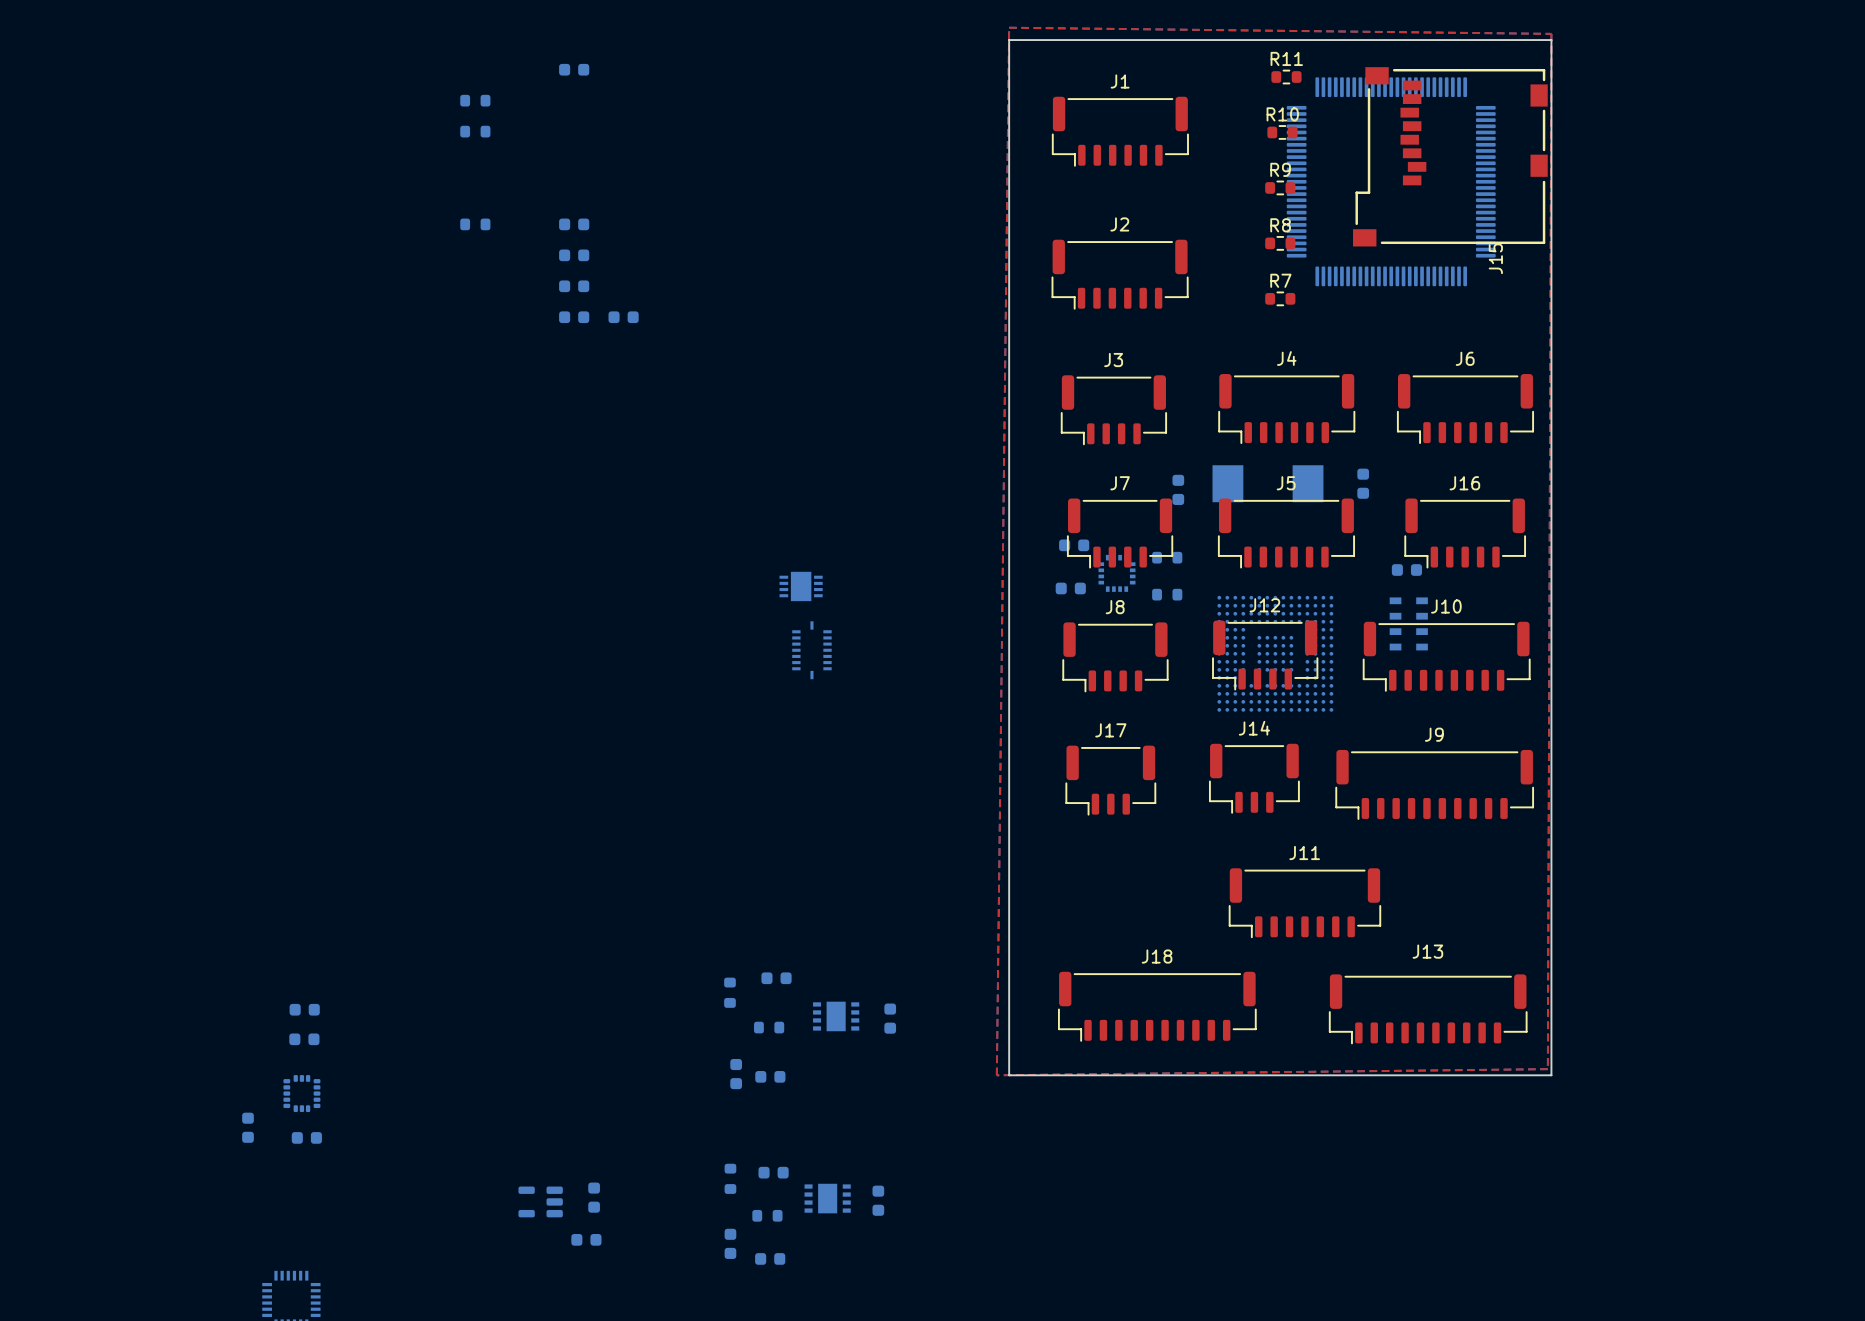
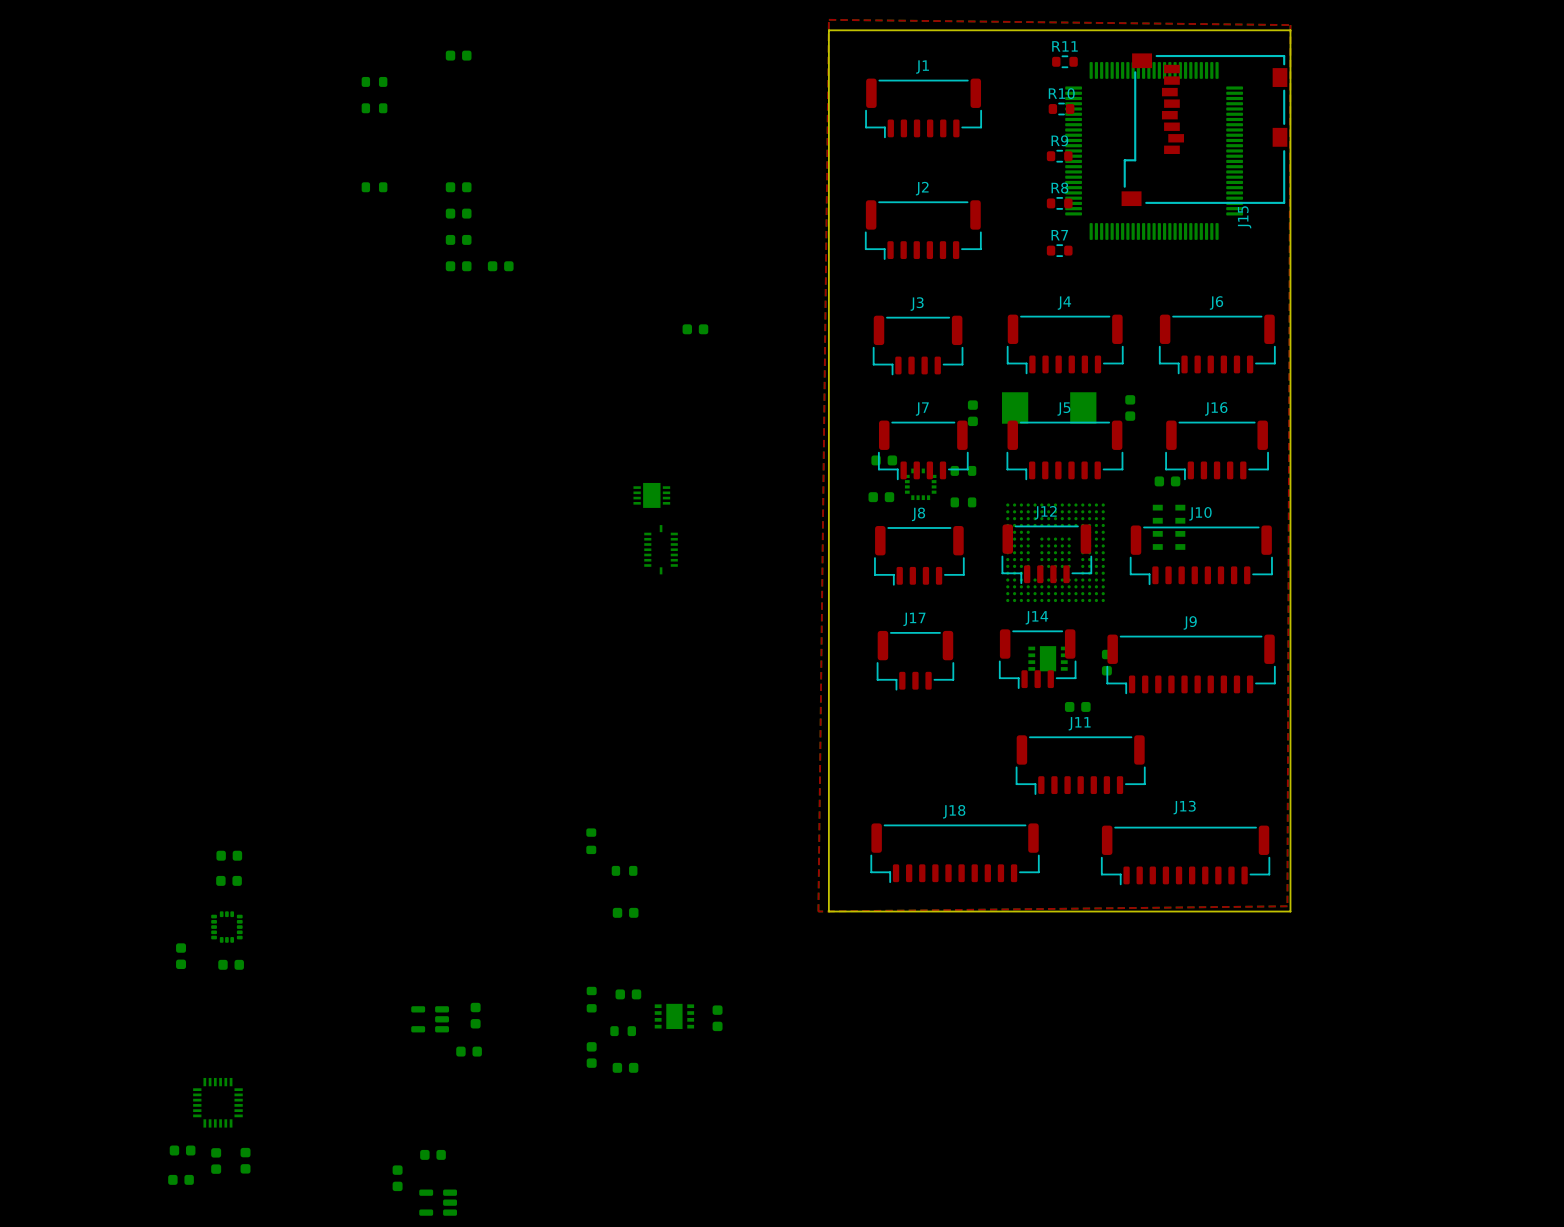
part: none -> (695, 329)
part: none -> (1048, 658)
part: none -> (1106, 662)
part: none -> (1077, 706)
part: (776, 978) -> none
part: (836, 1016) -> none
part: (890, 1018) -> none
part: (736, 1074) -> none

